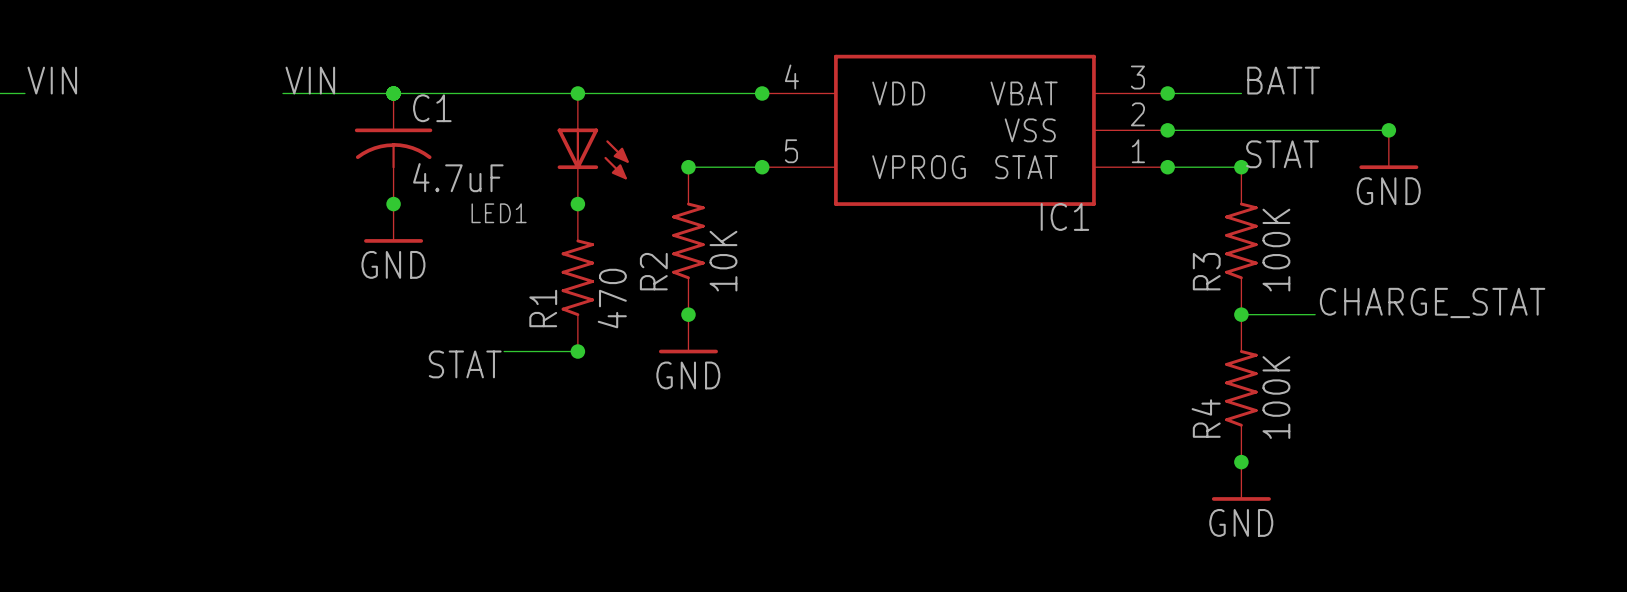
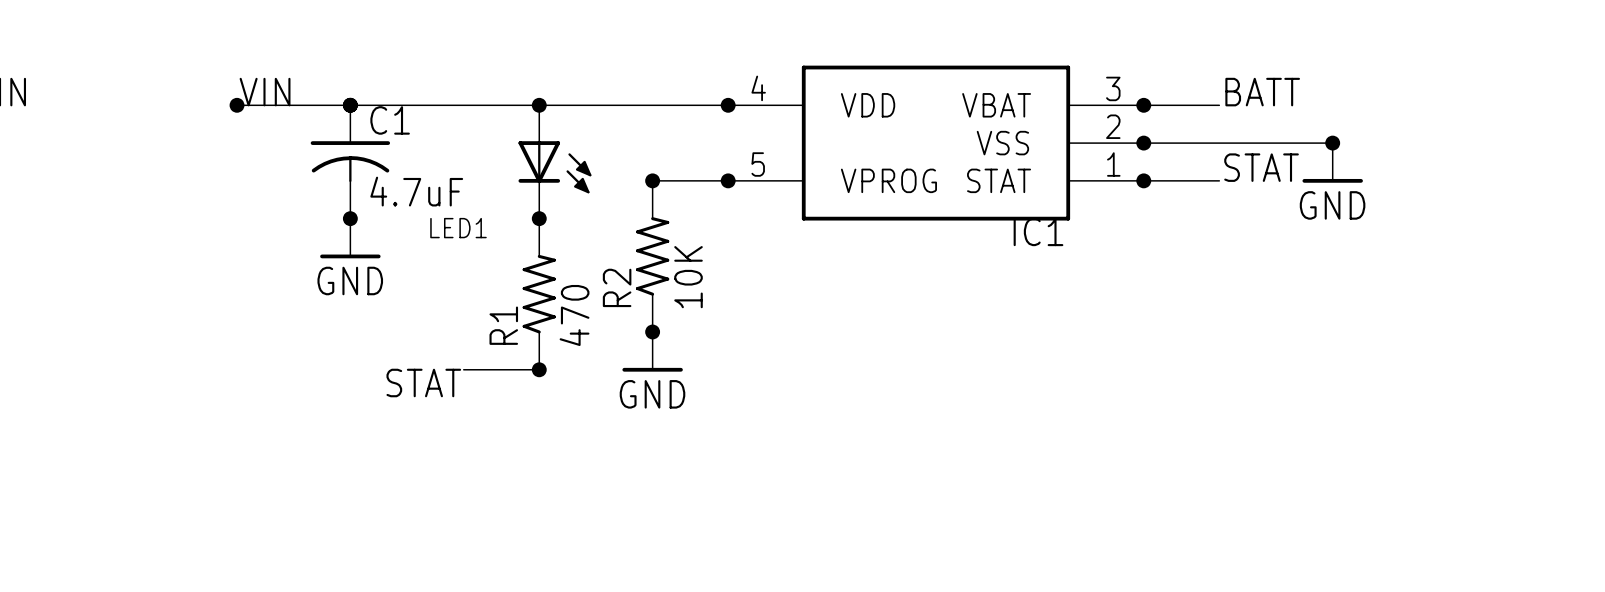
junction: none -> (237, 105)
wire: (1351, 130) (1388, 130) -> none
junction position: (1388, 130) -> (1332, 143)
power symbol position: GND (1388, 149) -> GND (1332, 162)
junction: (1241, 167) -> none
R3: 100K (1241, 240) -> none
label: CHARGE_STAT (1432, 302) -> none
wire: (1241, 314) (1315, 314) -> none
junction: (1241, 314) -> none
R4: 100K (1241, 388) -> none
junction: (1241, 462) -> none
power symbol: GND (1241, 481) -> none

